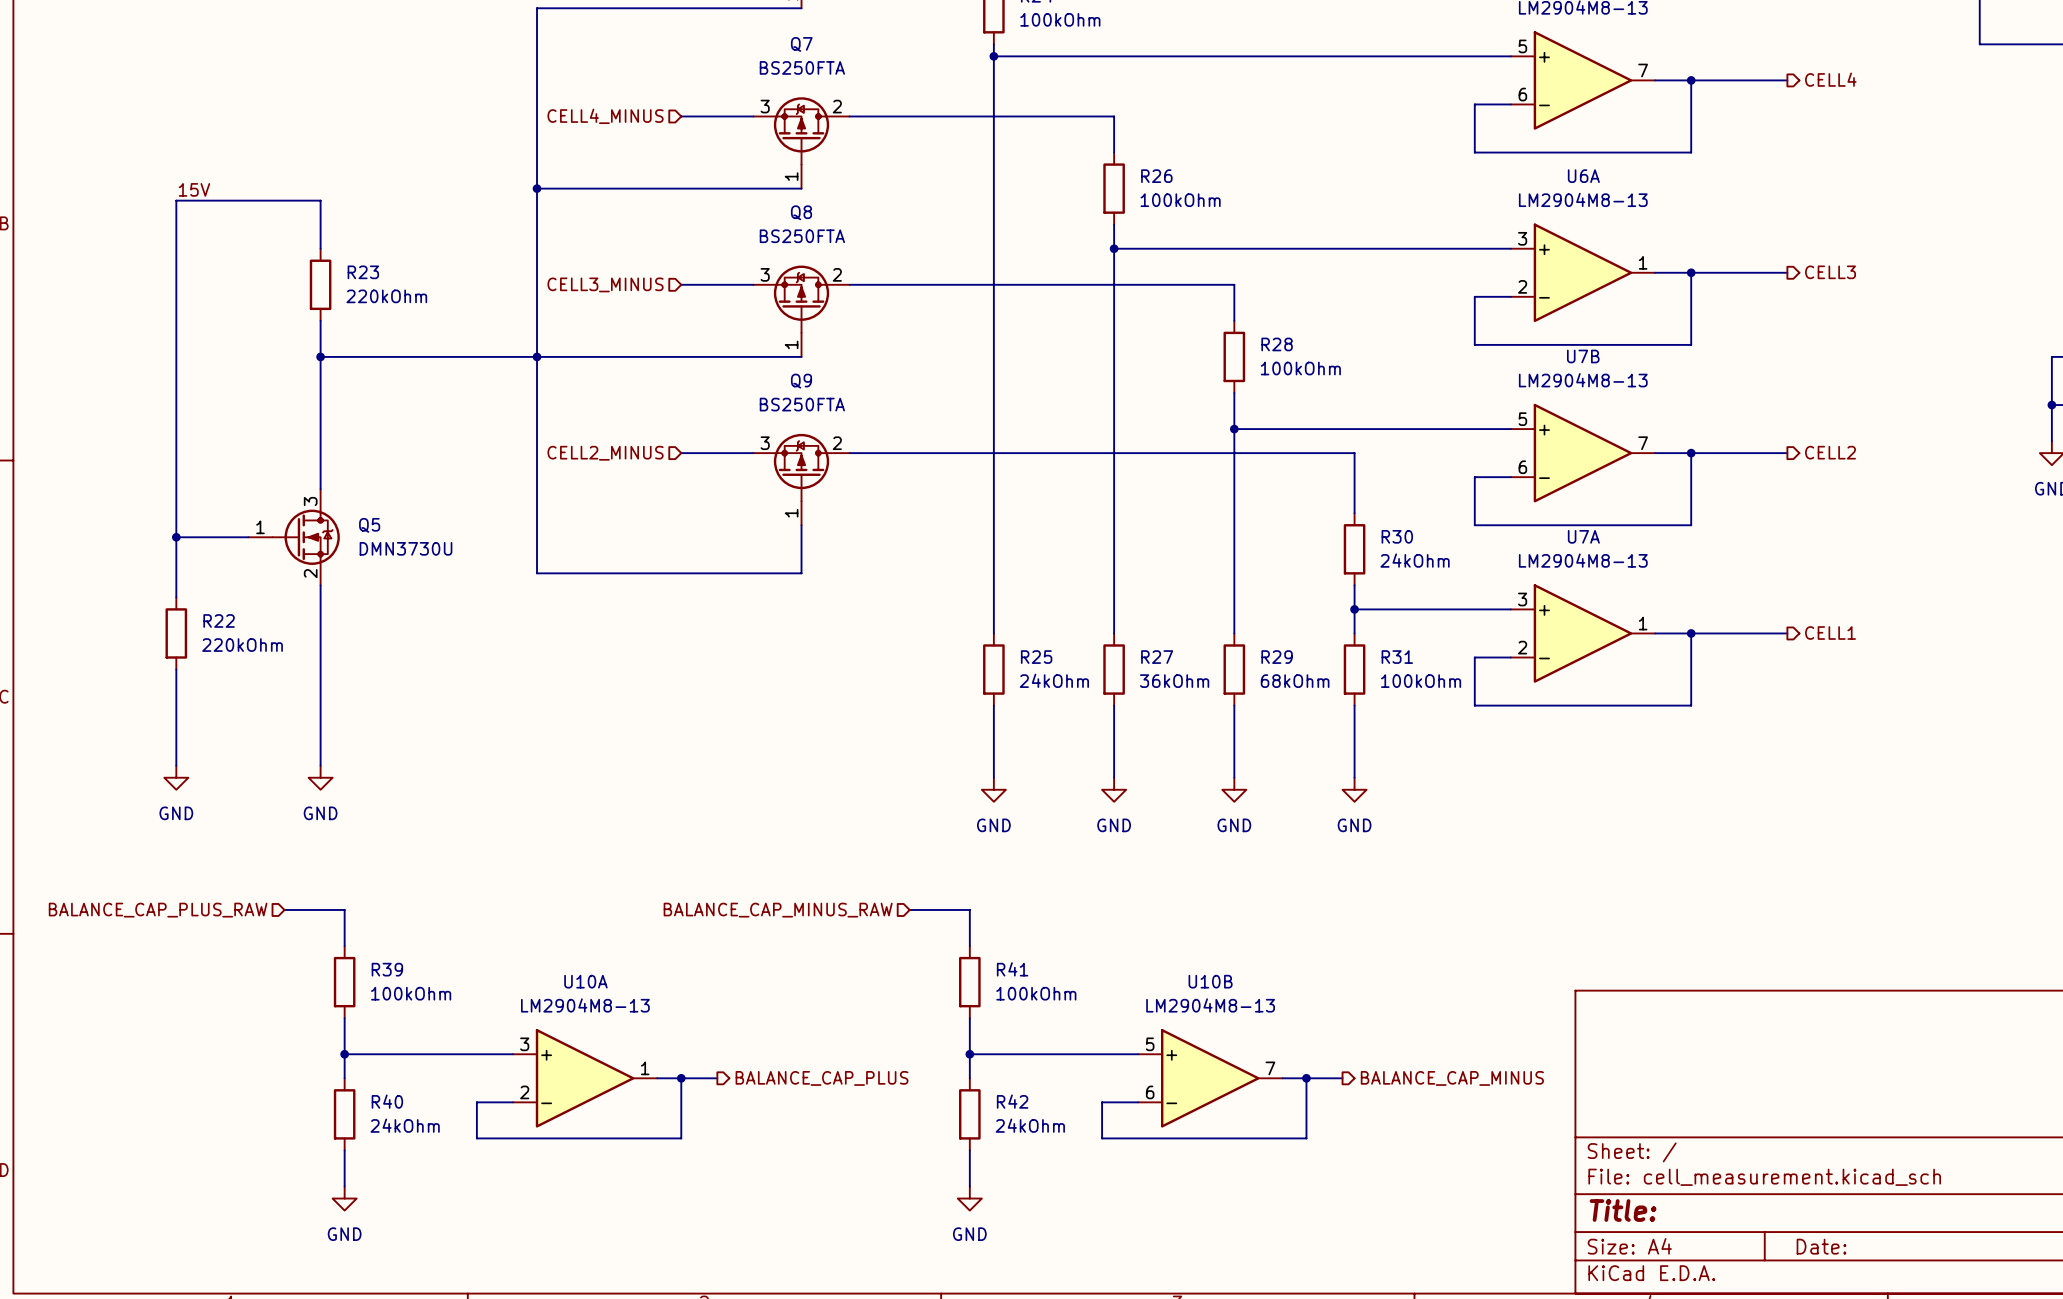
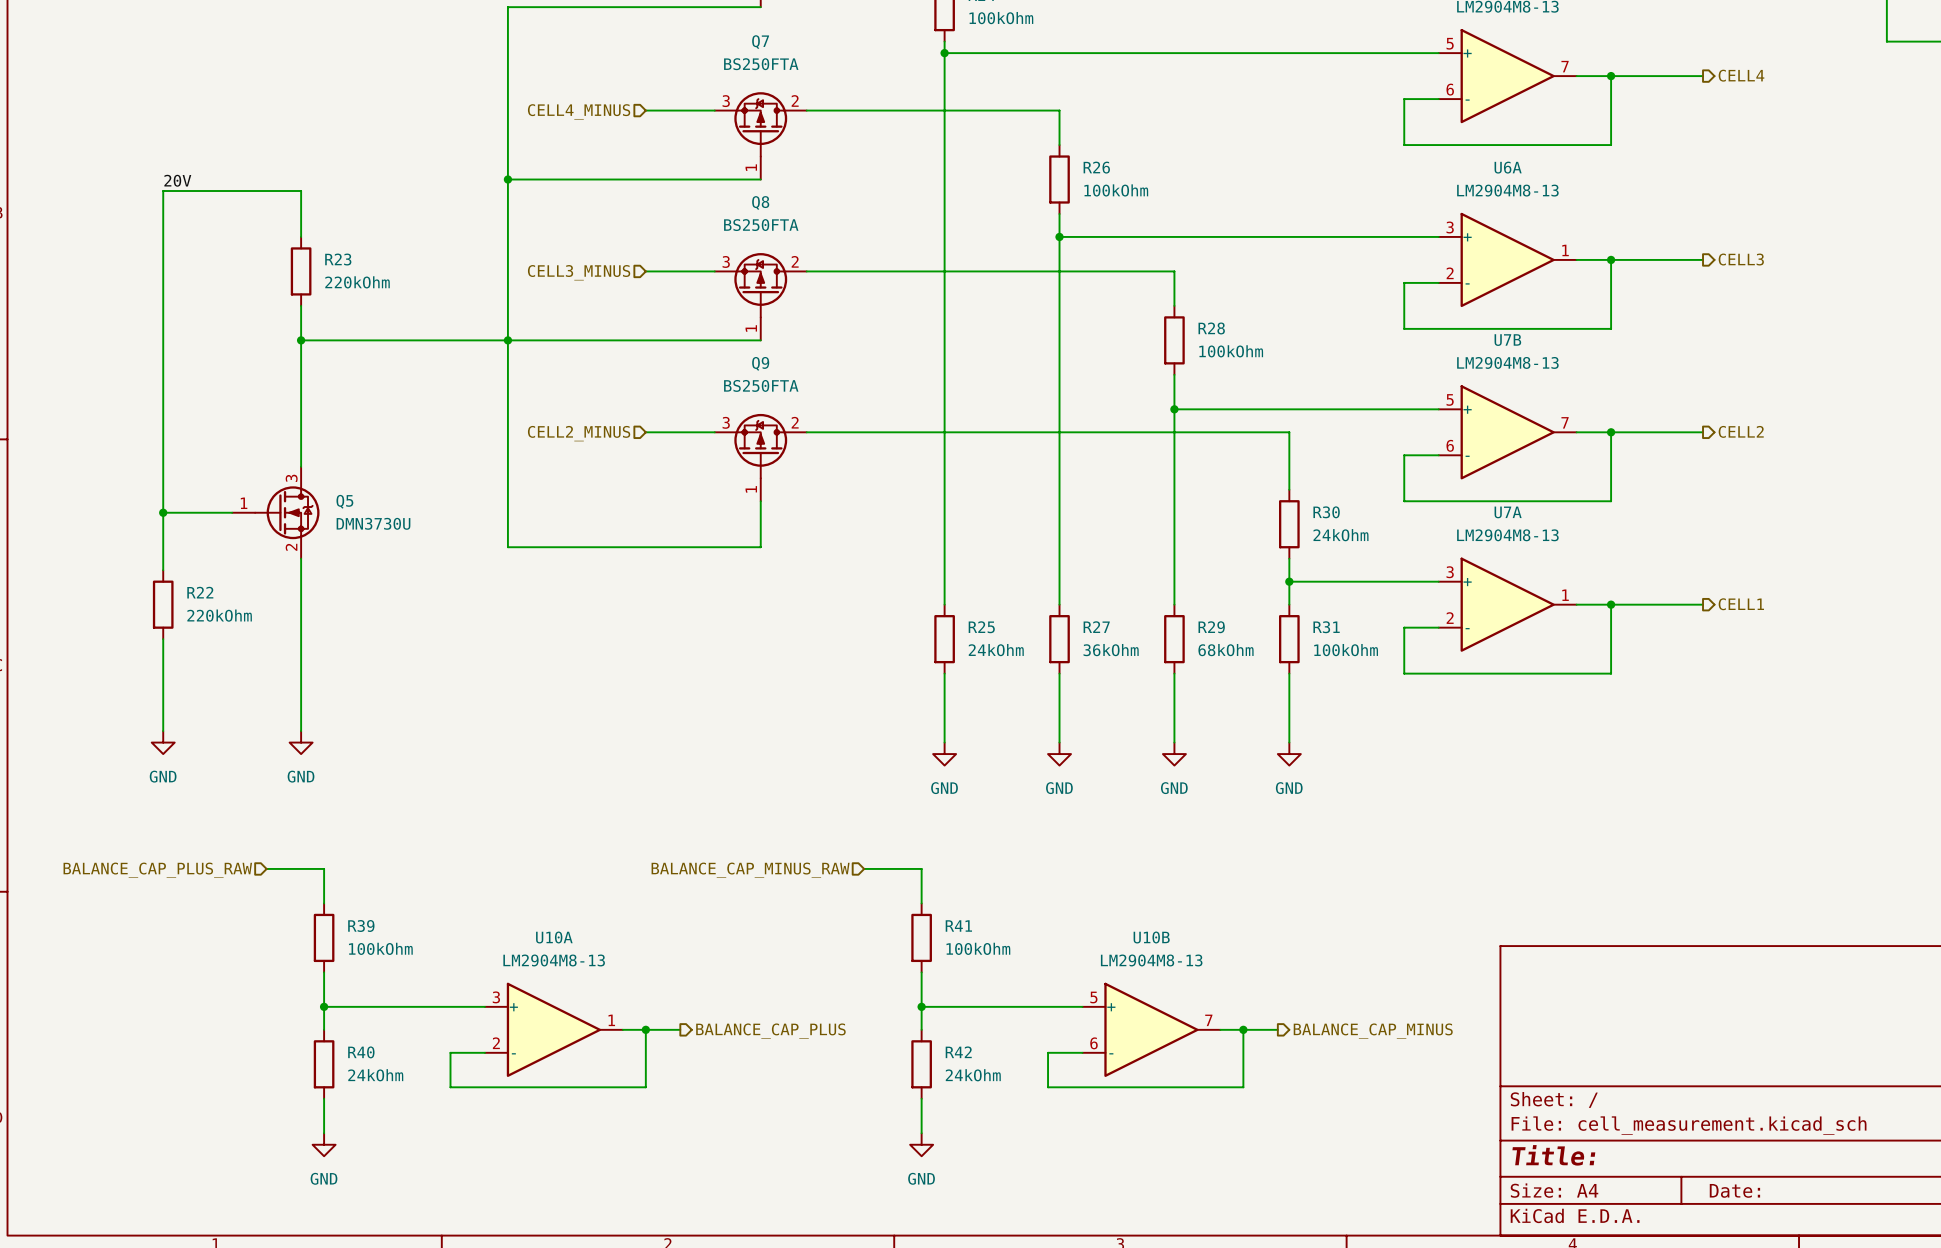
label: 15V (194, 189) -> 20V (177, 180)

